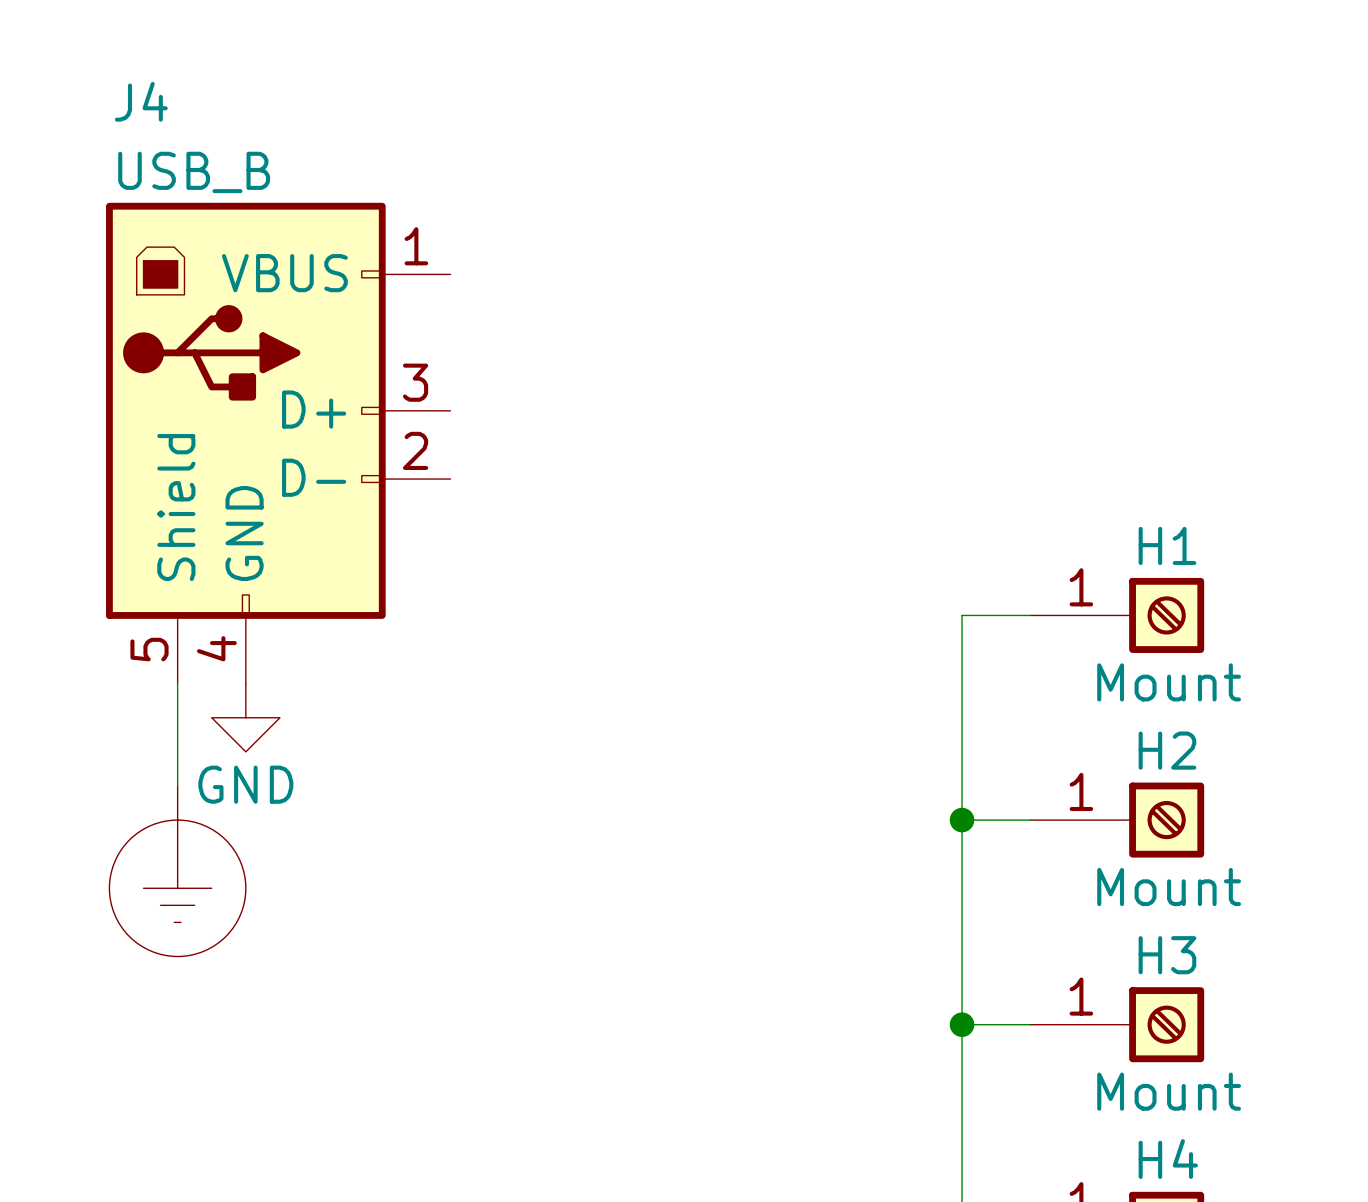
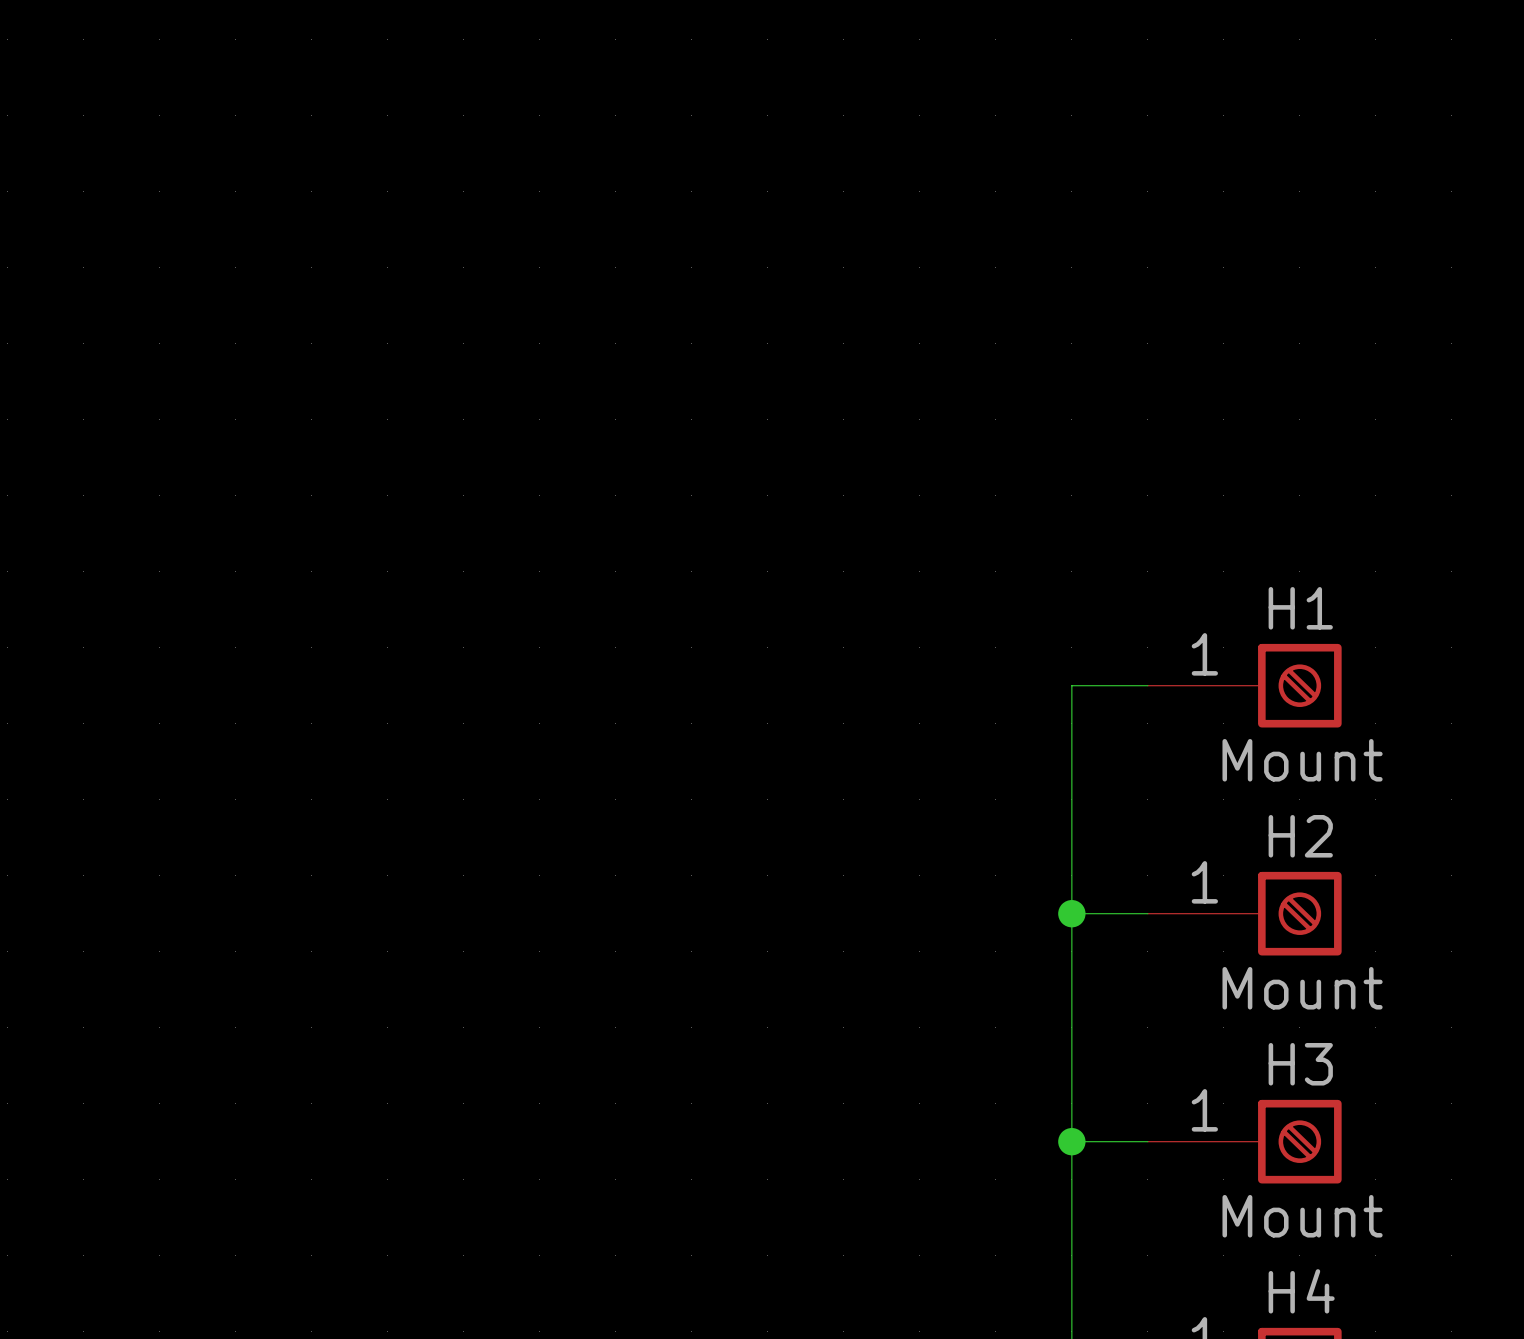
J4: USB_B (278, 443) -> none
wire: (177, 683) (177, 785) -> none
power symbol: GND (245, 717) -> none
power symbol: (177, 871) -> none

